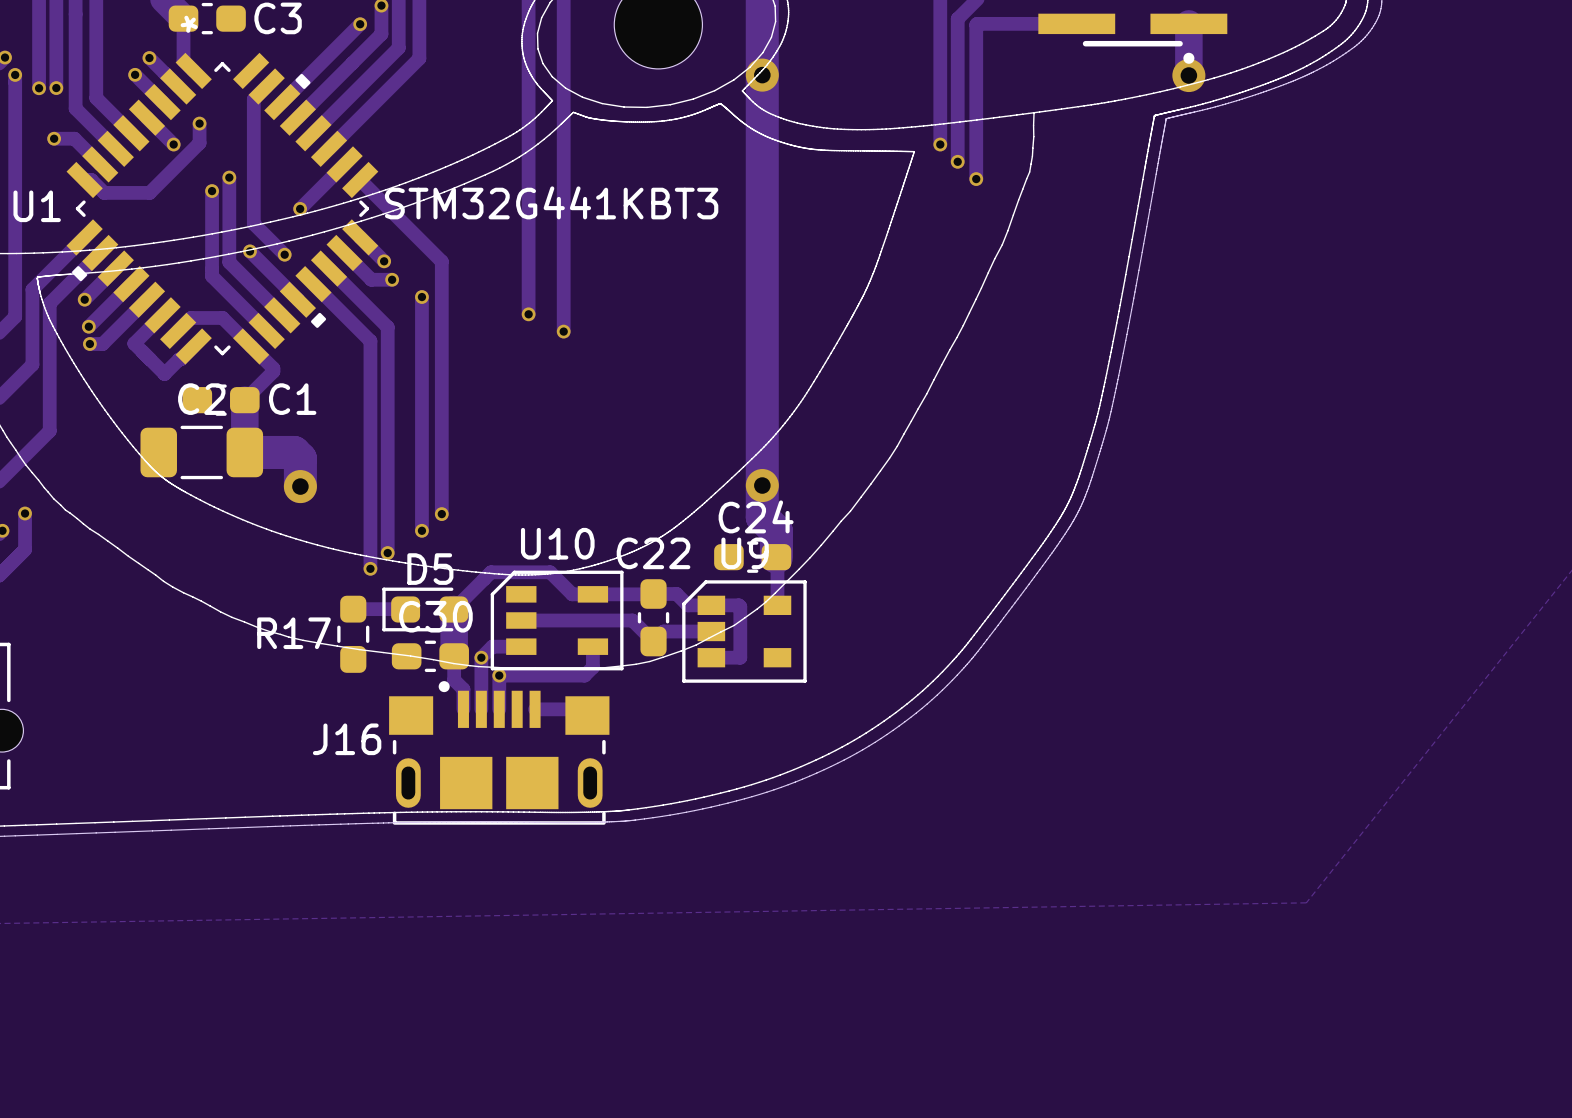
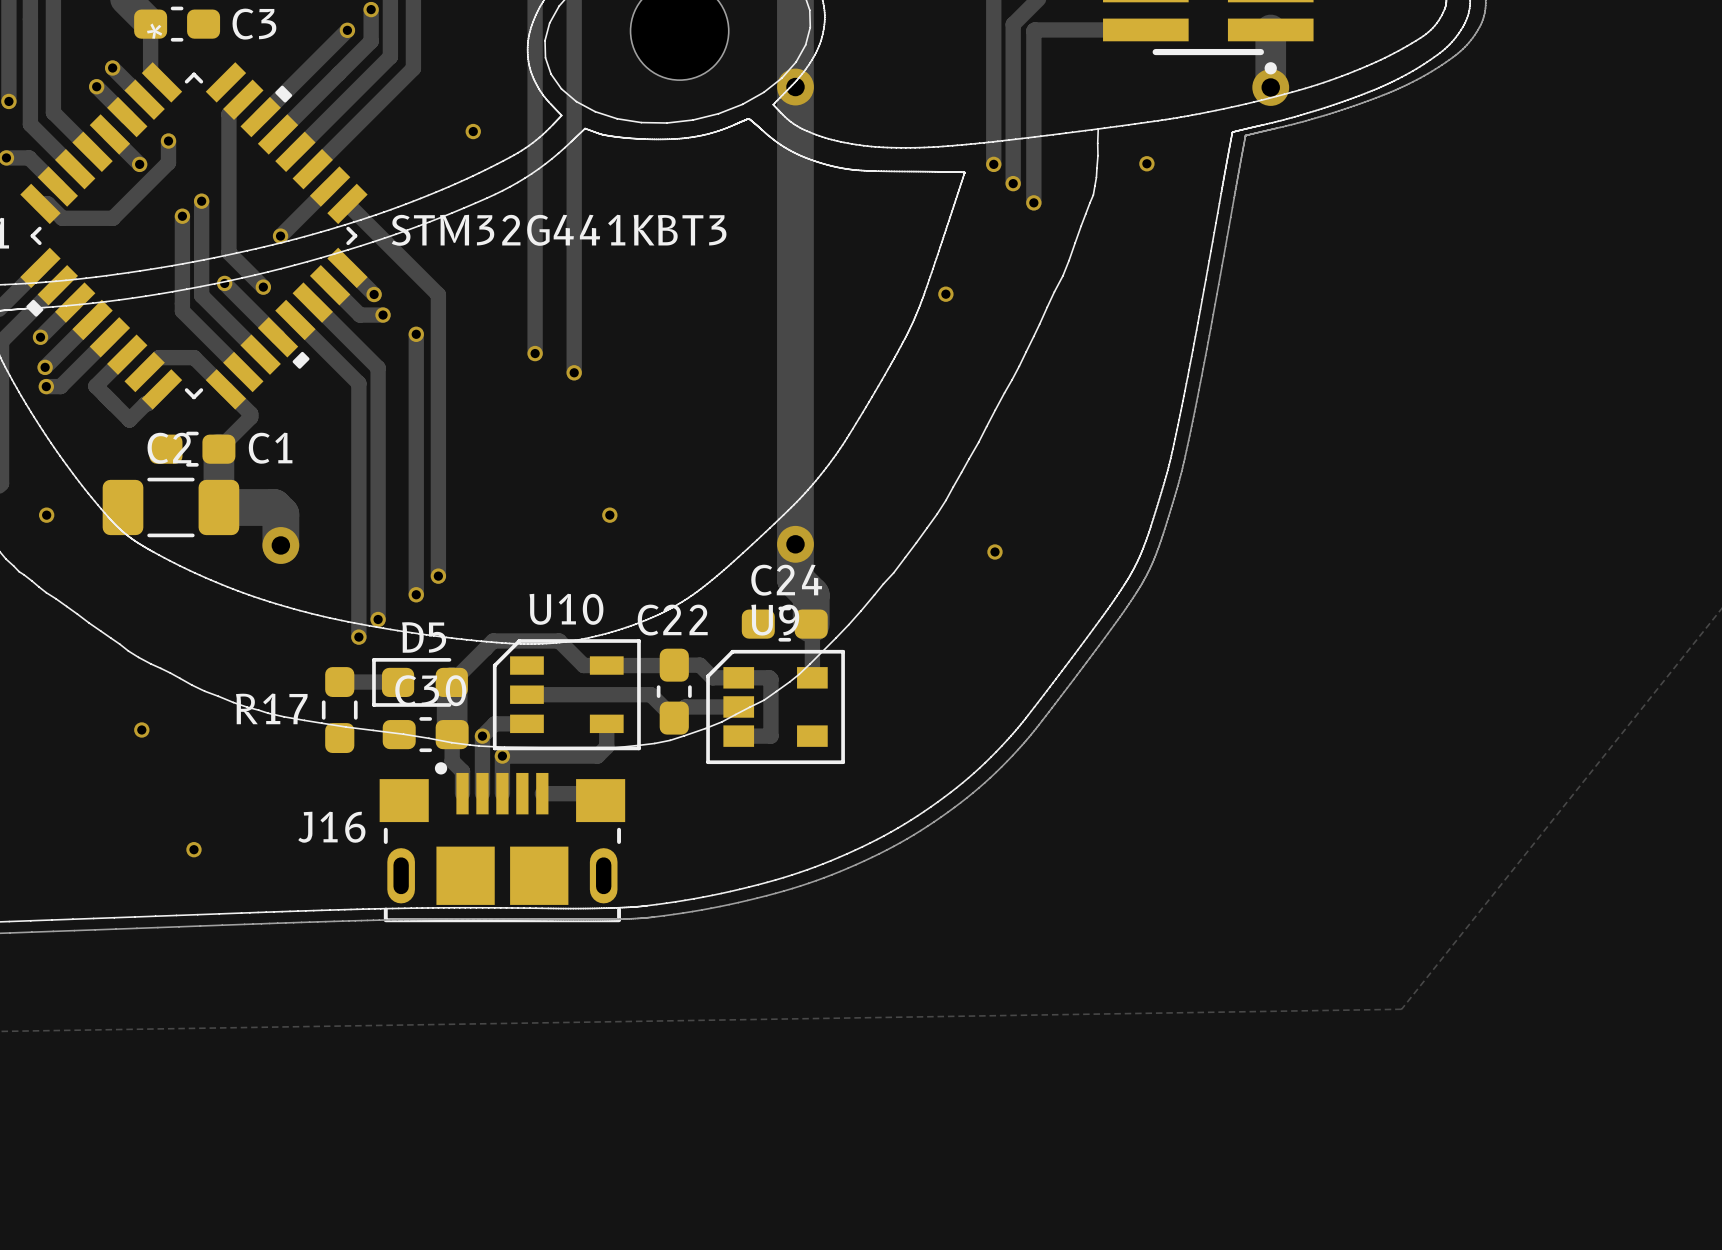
via: none -> (473, 131)
via: none -> (1146, 163)
via: none -> (945, 294)
via: none -> (46, 515)
via: none -> (609, 515)
via: none -> (994, 551)
via: none -> (141, 729)
via: none -> (193, 849)

